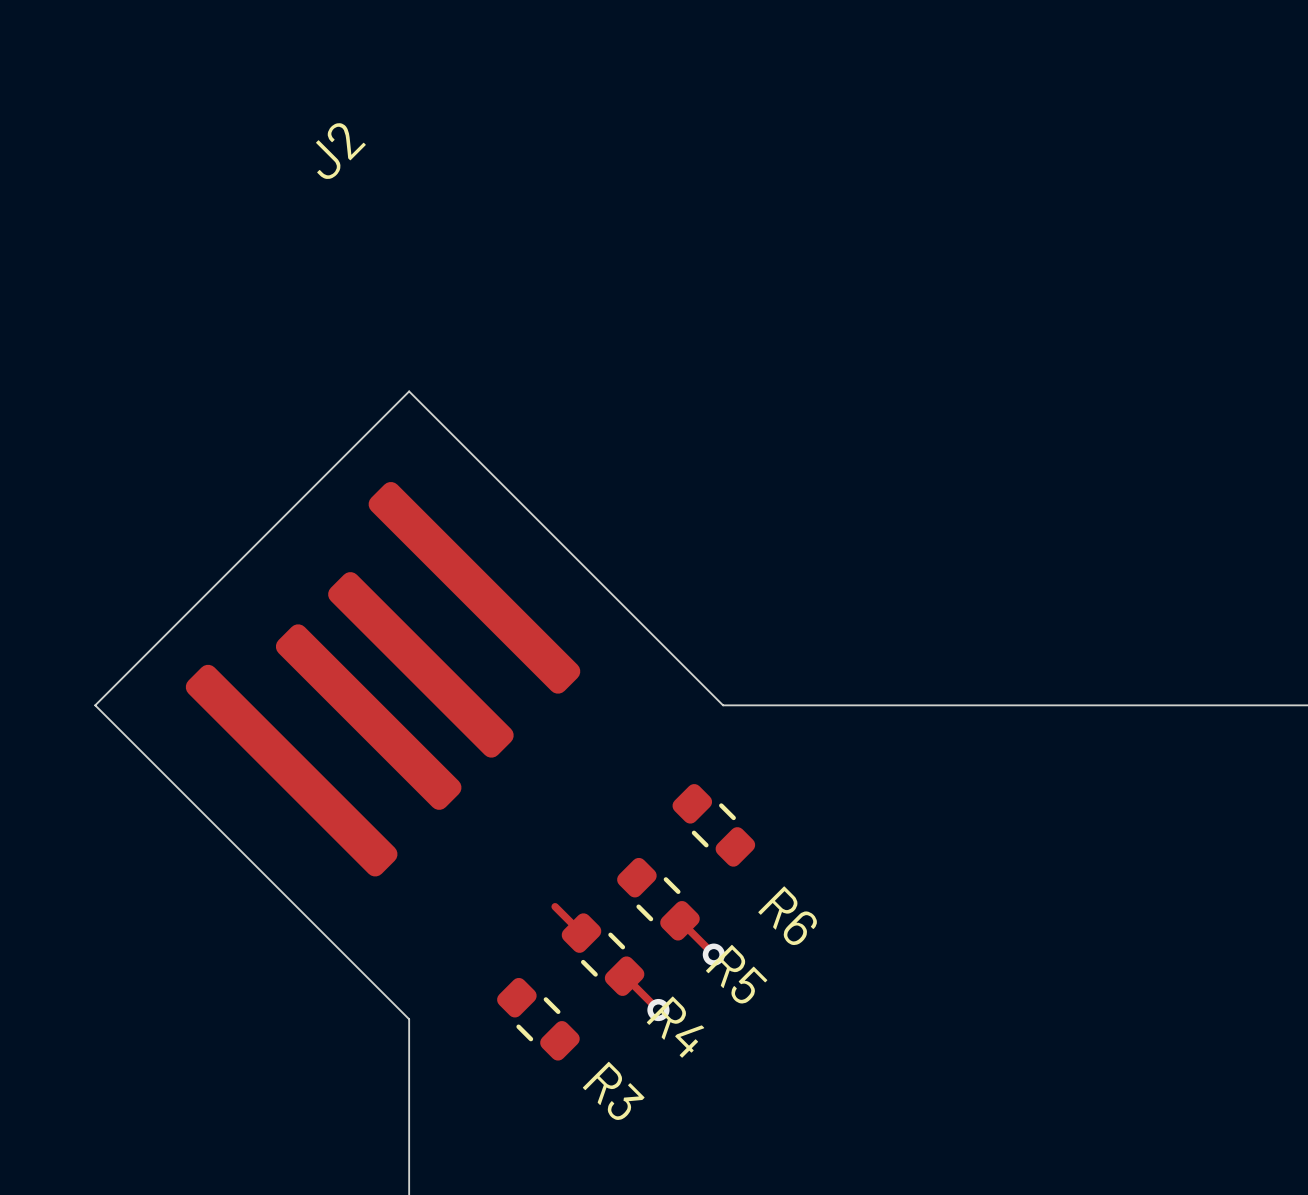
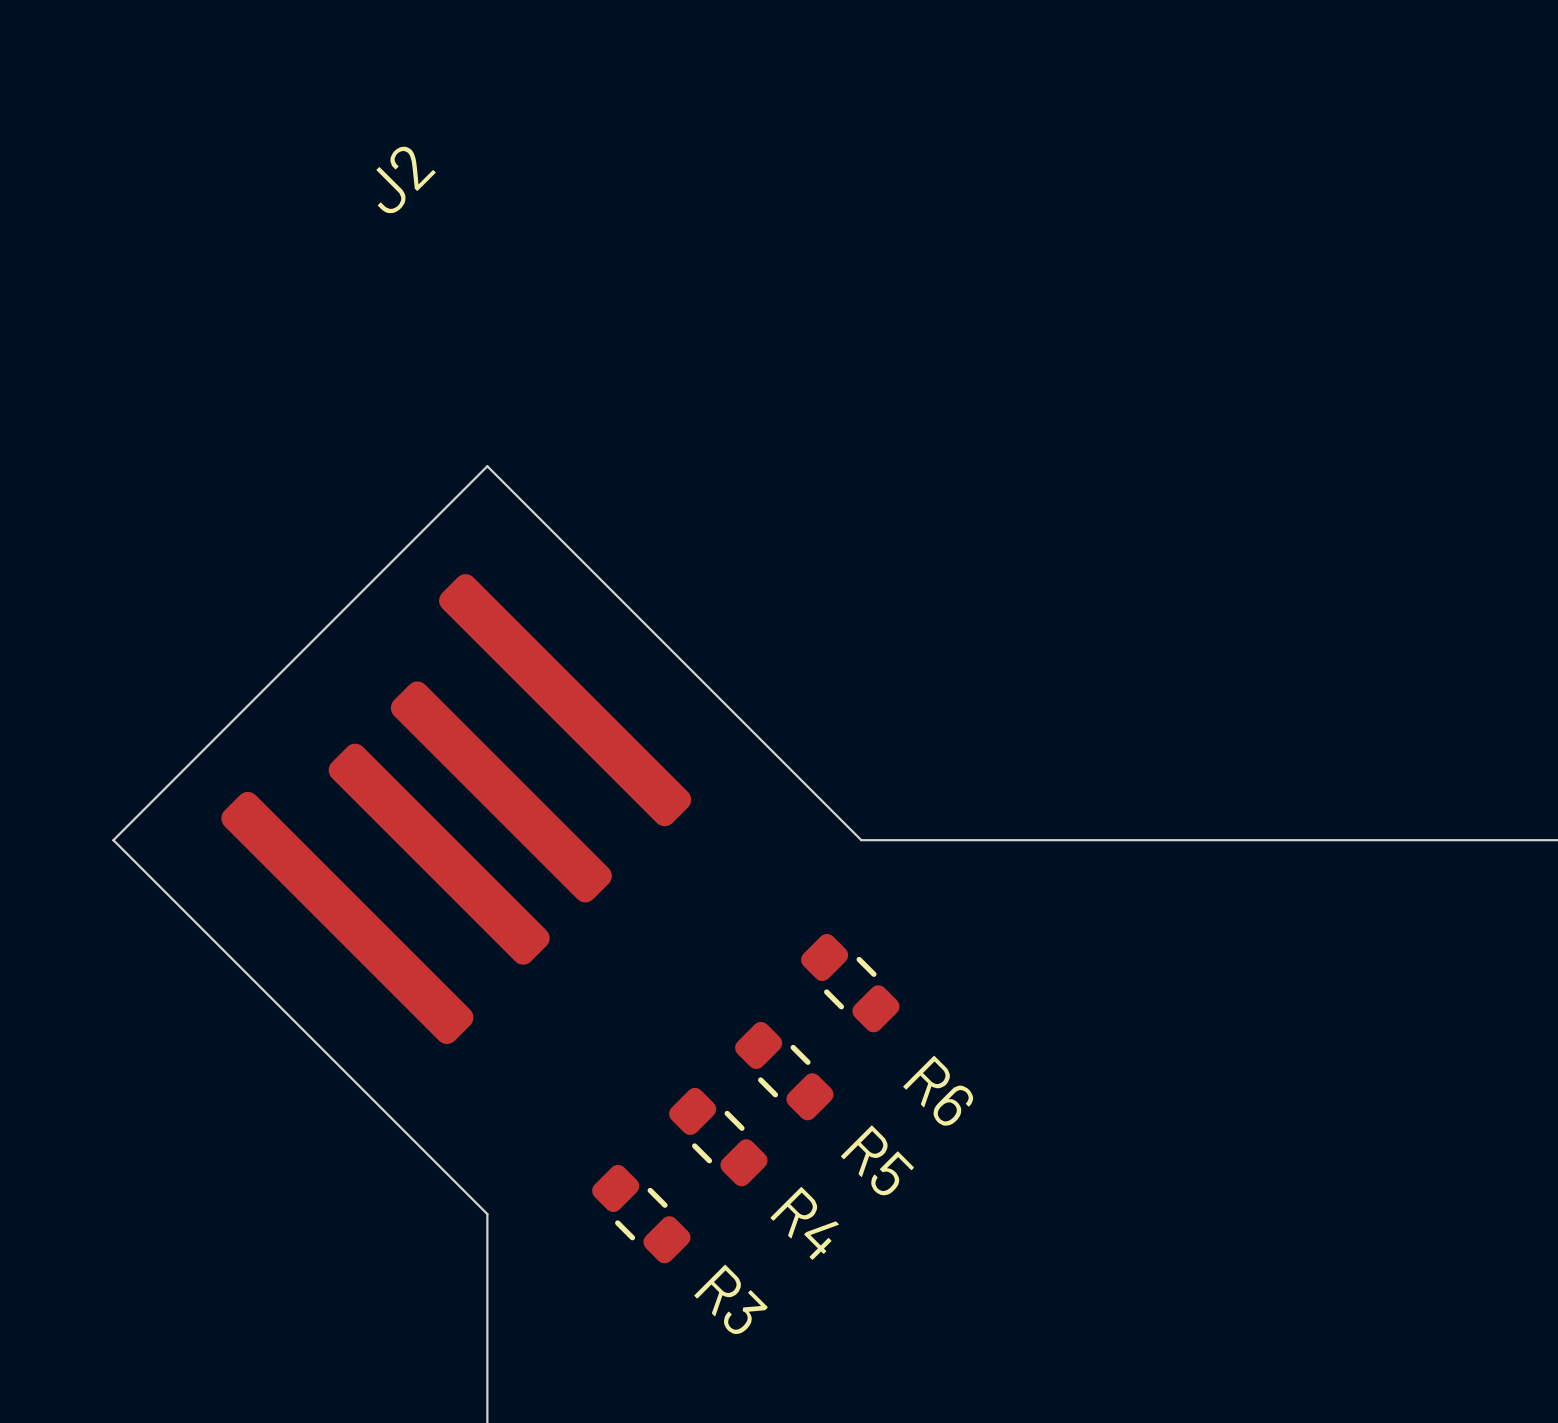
track: (555, 906) (581, 933) -> none
track: (679, 920) (713, 954) -> none
via: (713, 954) -> none
track: (624, 976) (658, 1010) -> none
via: (658, 1010) -> none

